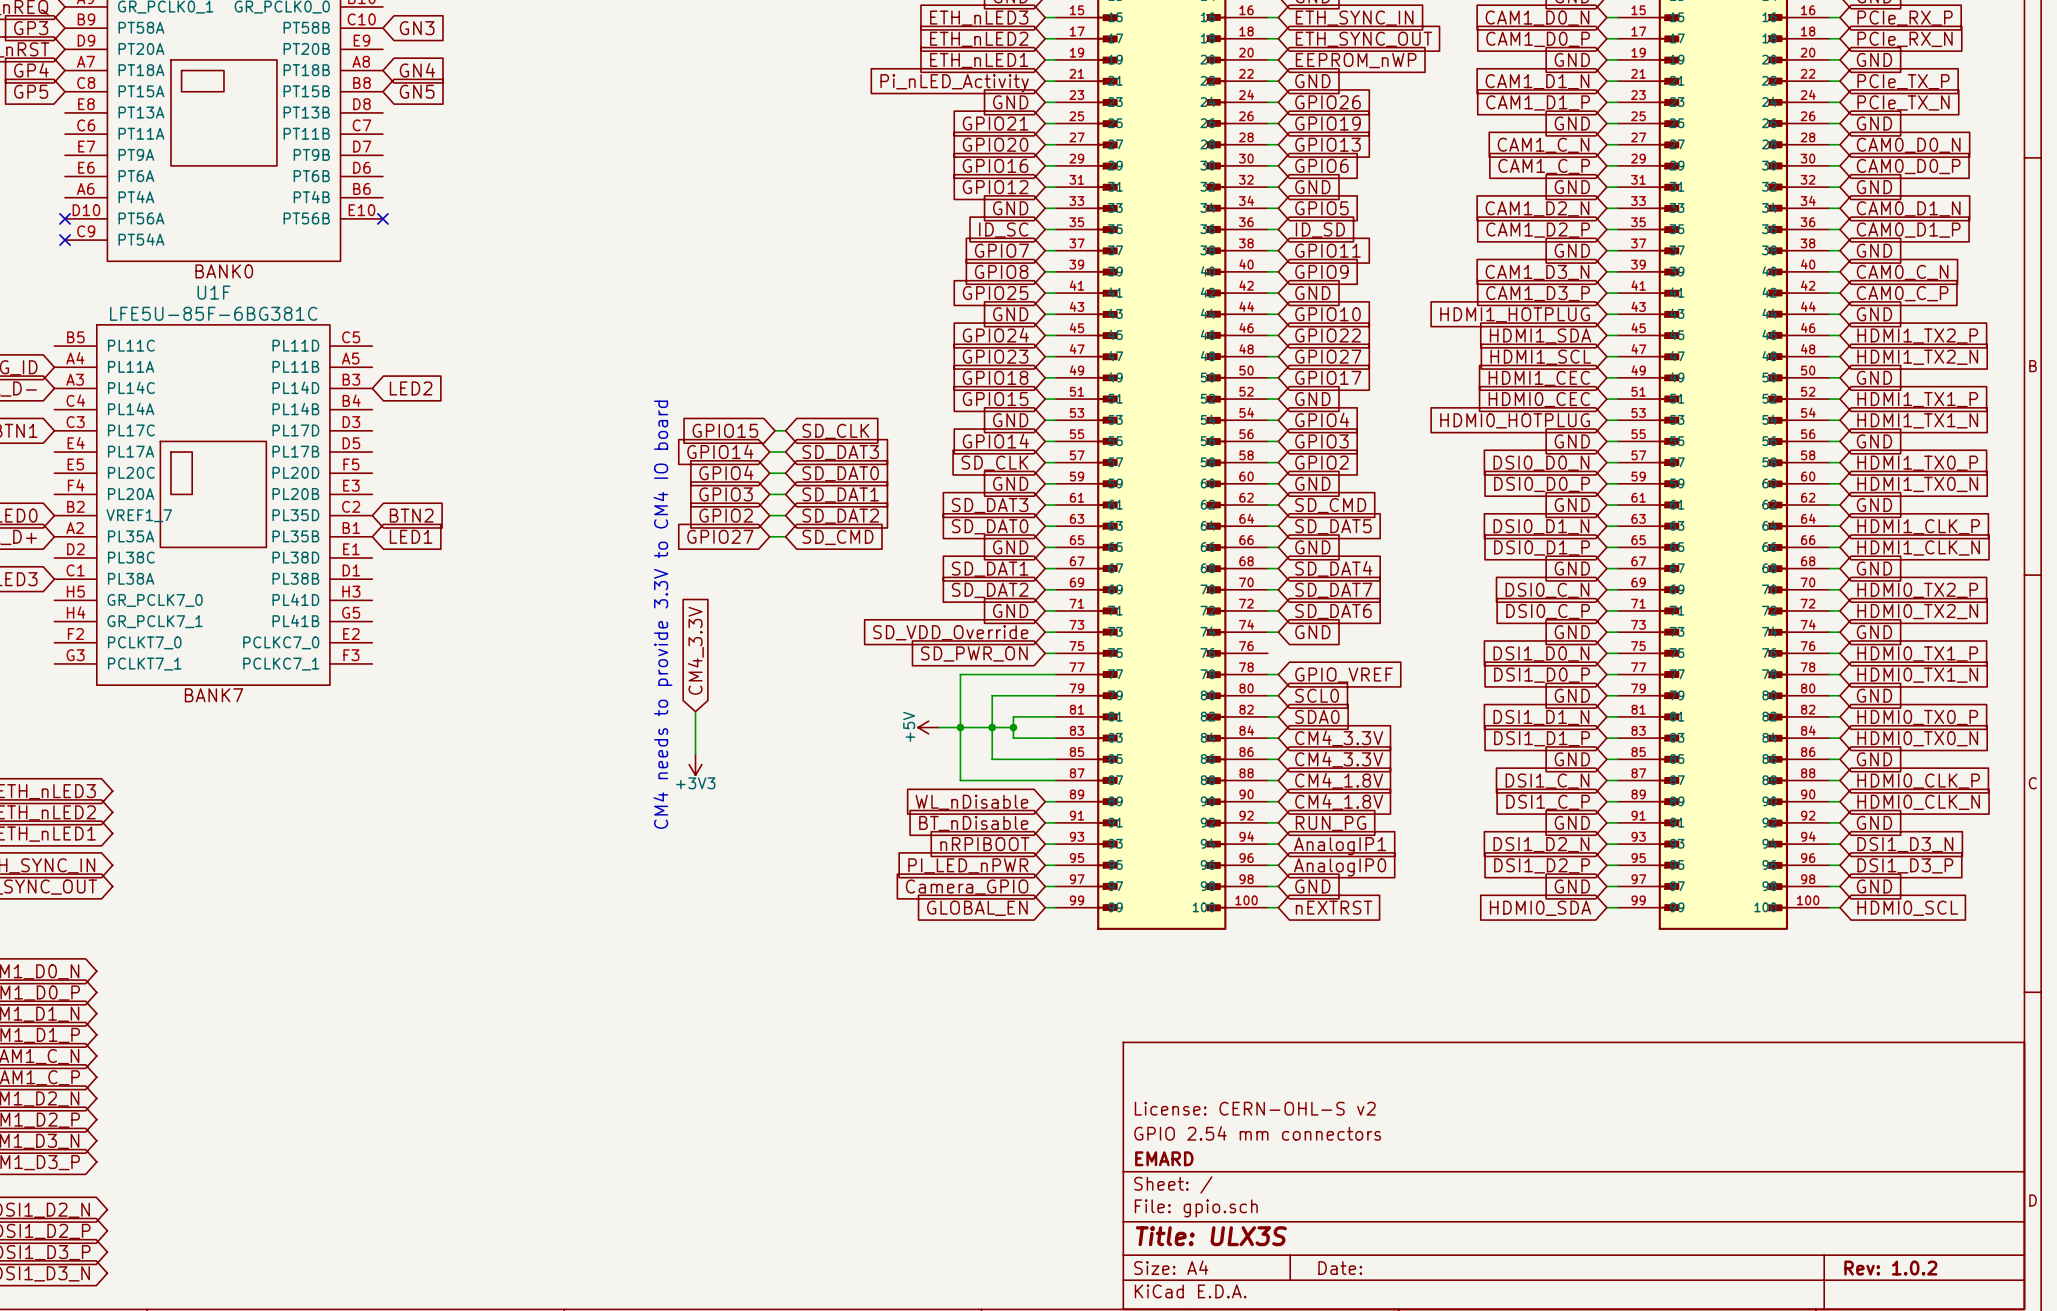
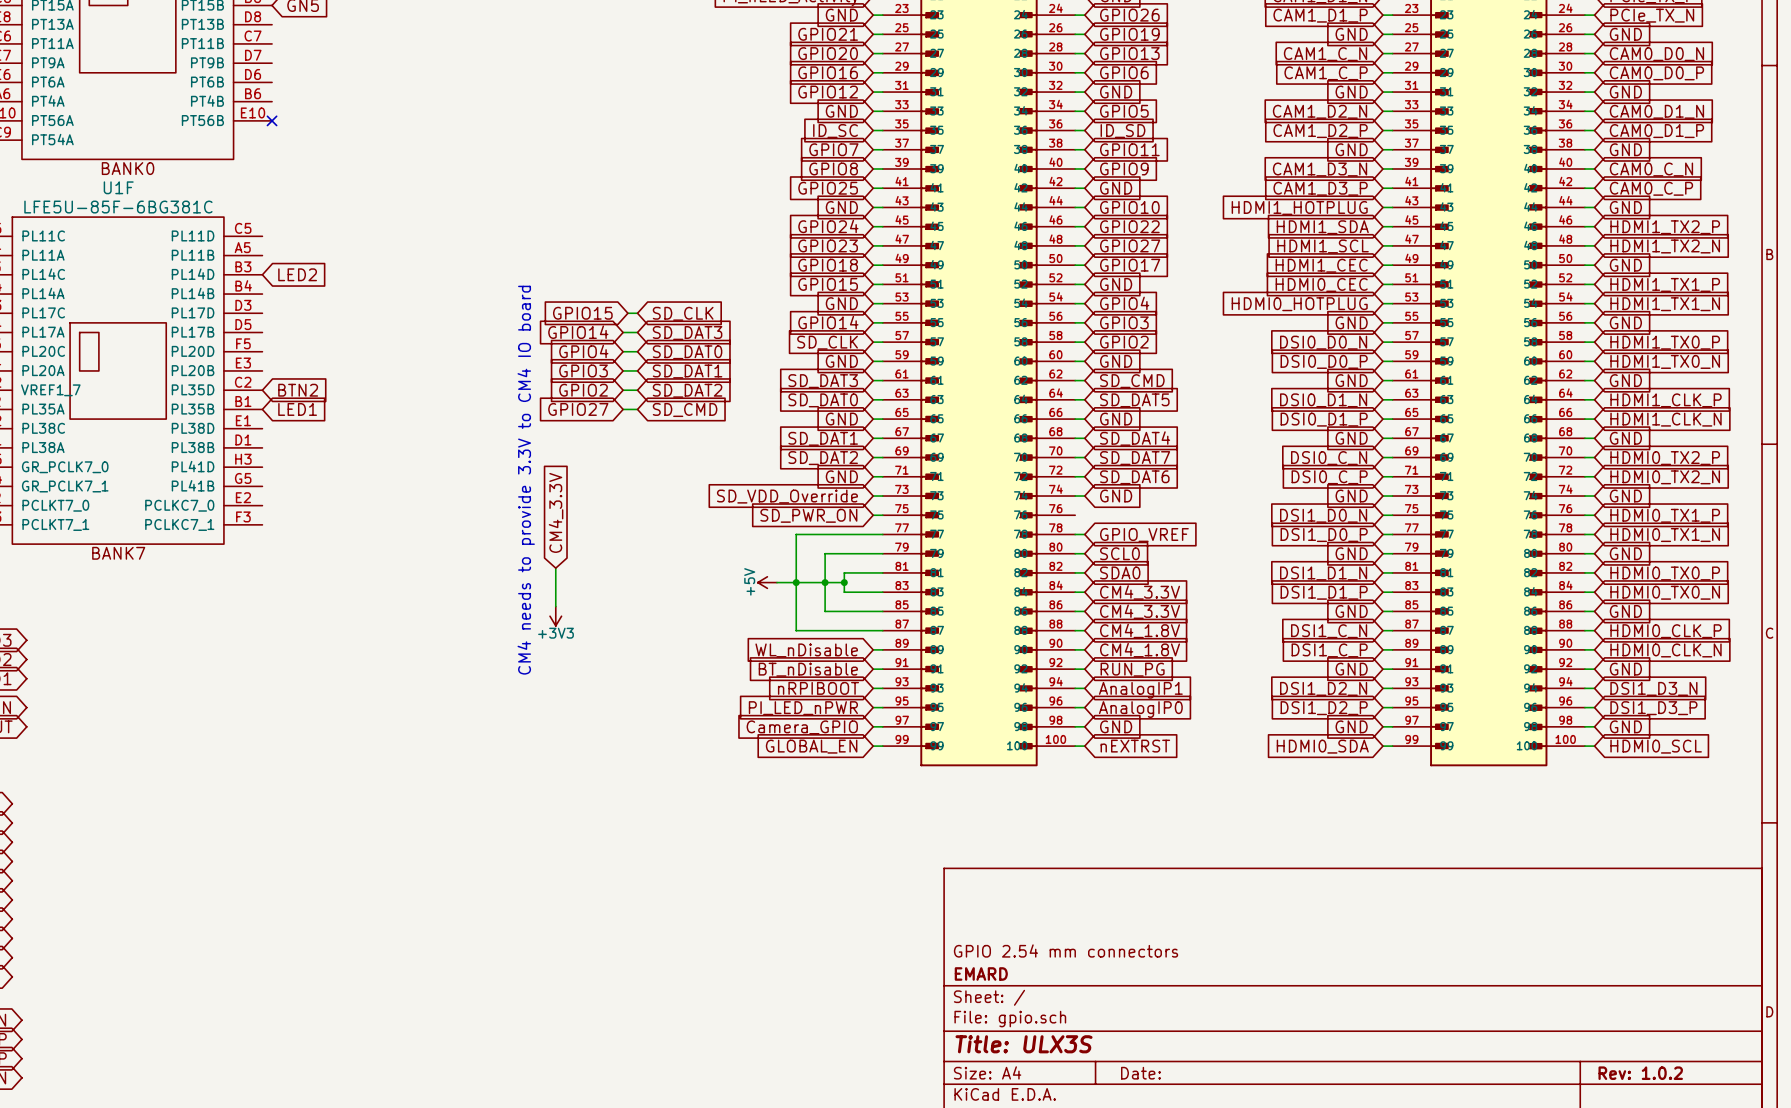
title block: License: CERN-OHL-S v2 (1255, 1108) -> none

